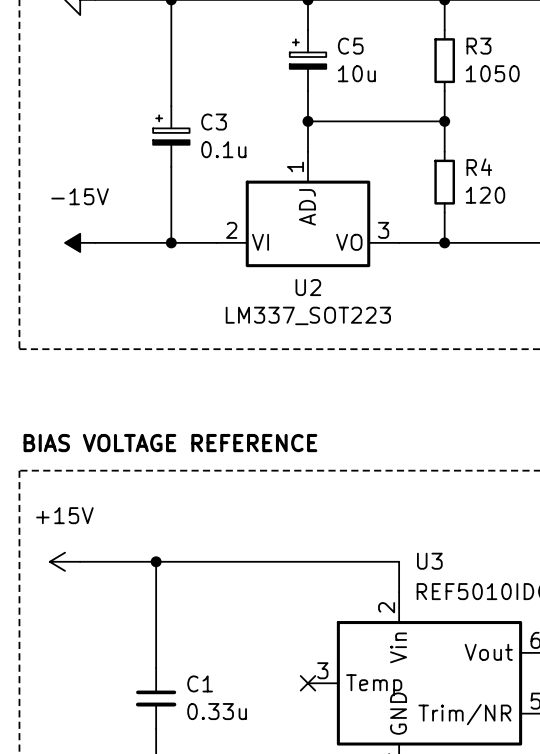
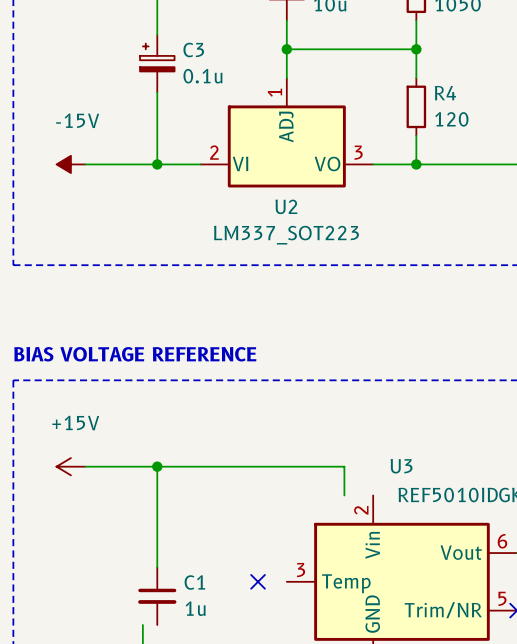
power symbol position: +15V (65, 561) -> +15V (70, 466)
wire: (156, 561) (156, 668) -> (157, 466) (157, 567)
junction position: (156, 561) -> (157, 466)
wire: (368, 561) (399, 561) (399, 592) -> (344, 466) (344, 495)
no-connect mark position: (308, 683) -> (258, 581)
C1 position: (156, 698) -> (157, 596)
C1 value: 0.33u (217, 711) -> 1u (195, 608)

